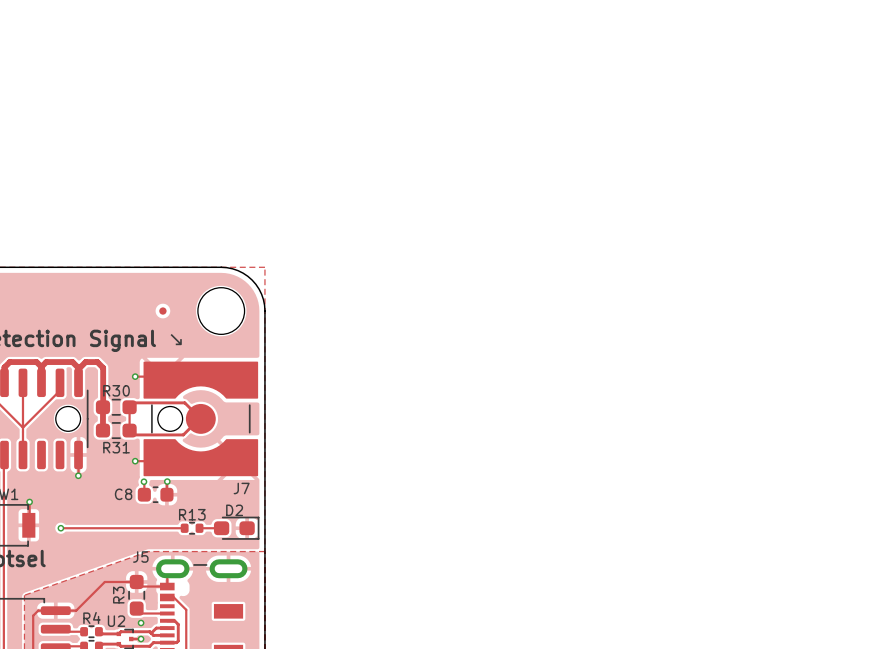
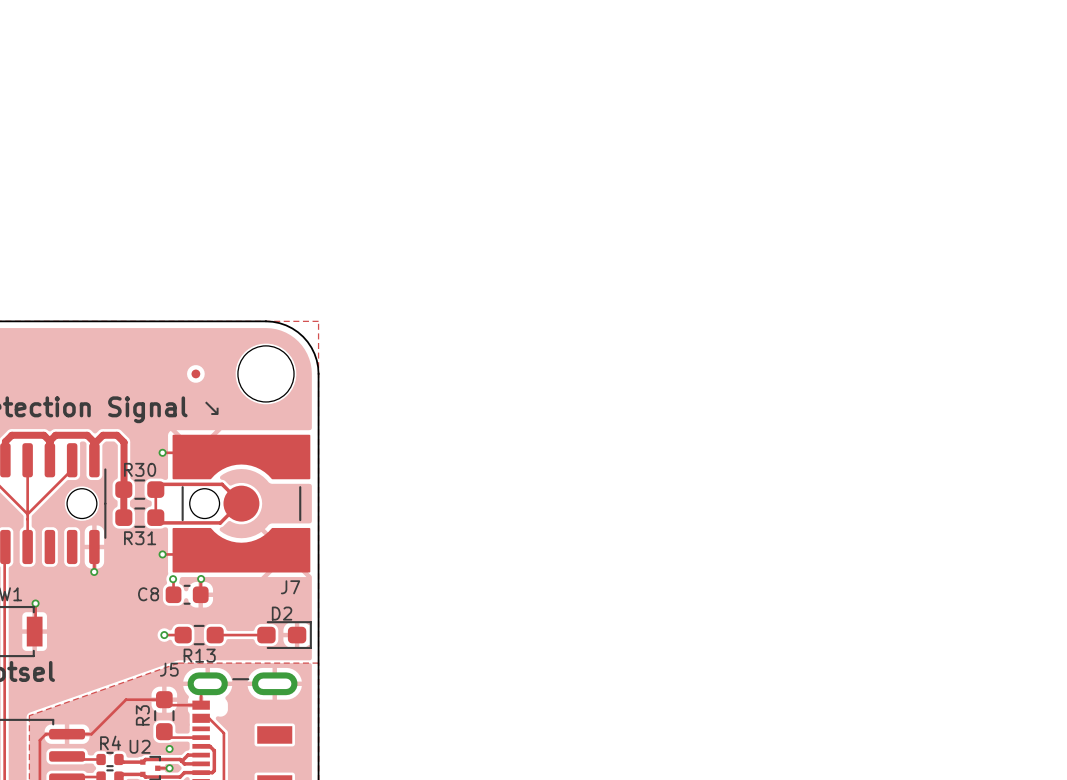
R13 name position: R13 (192, 514) -> R13 (199, 655)
R13 footprint: [180, 521, 204, 535] -> [174, 624, 224, 646]
track: (60, 528) (136, 528) -> none
via position: (60, 528) -> (164, 635)
track: (152, 528) (178, 528) -> none
track: none -> (221, 635) (239, 635)

